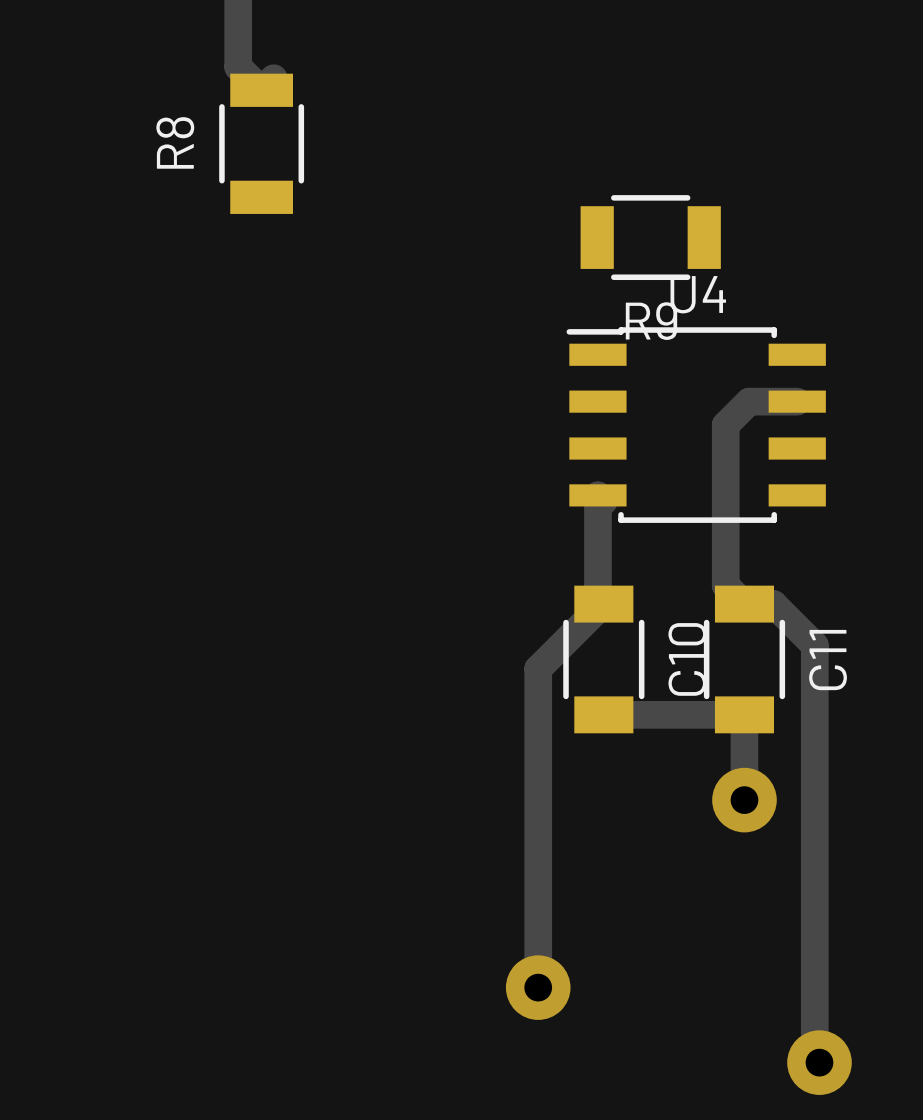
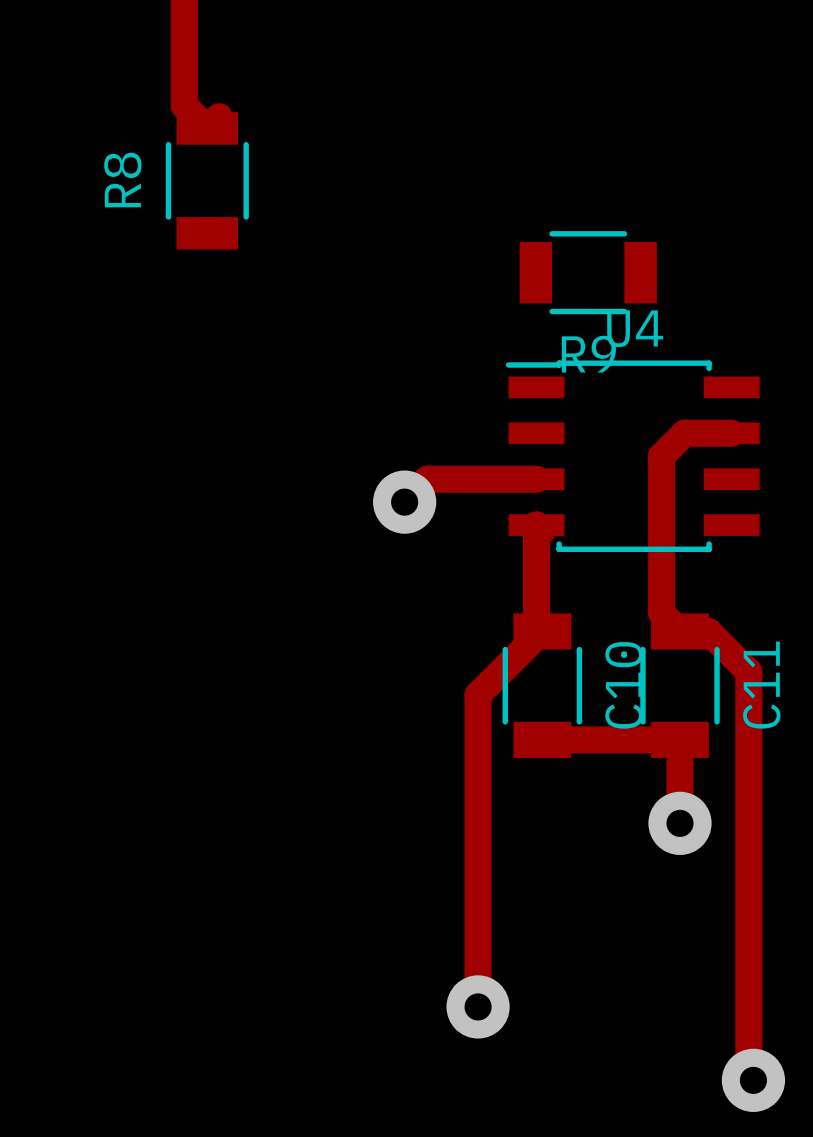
track: none -> (536, 479) (427, 479) (404, 502)
via: none -> (404, 502)

